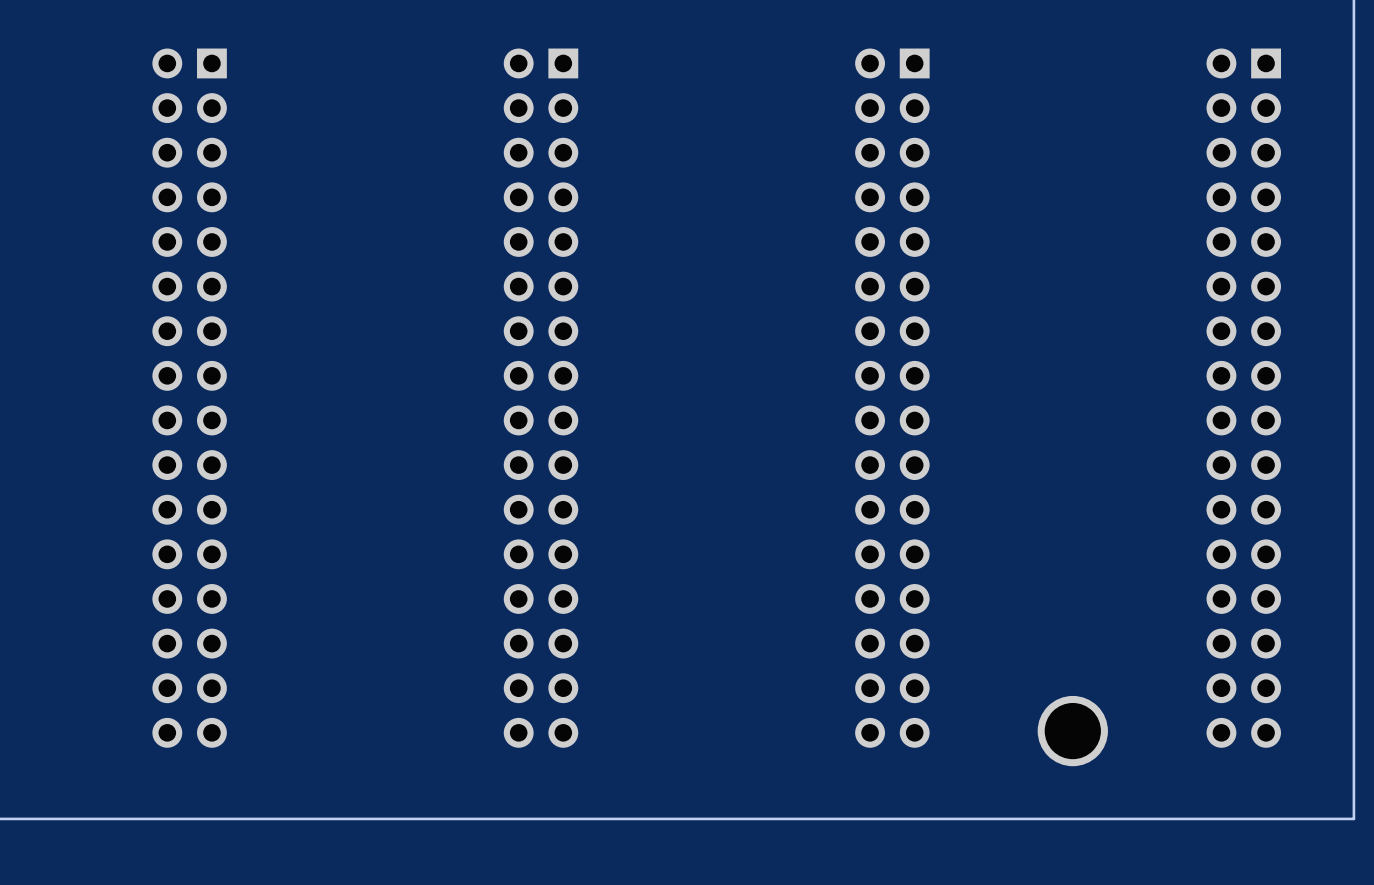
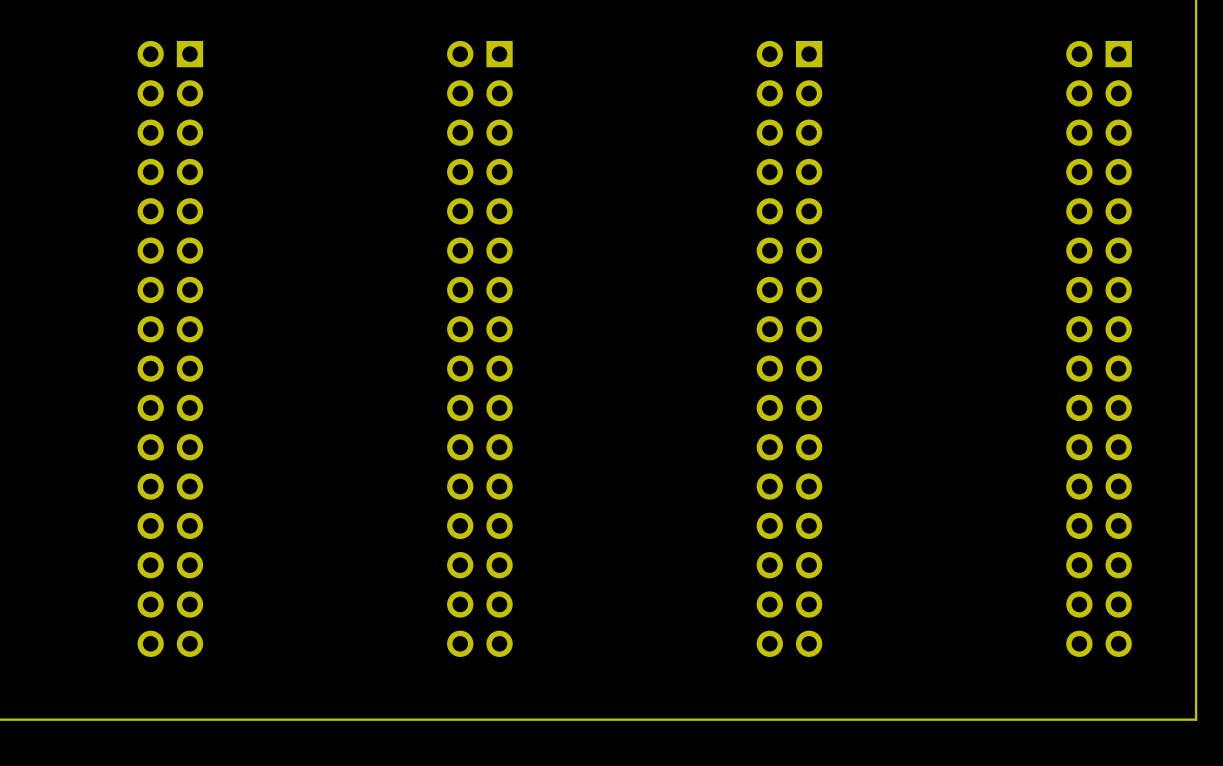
part: (1072, 731) -> none

